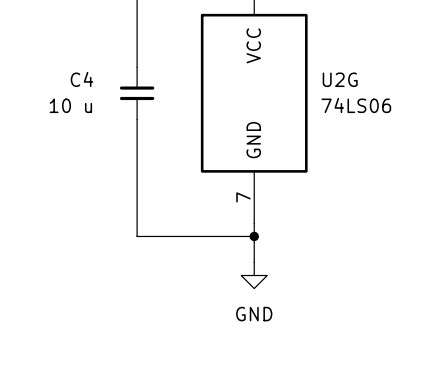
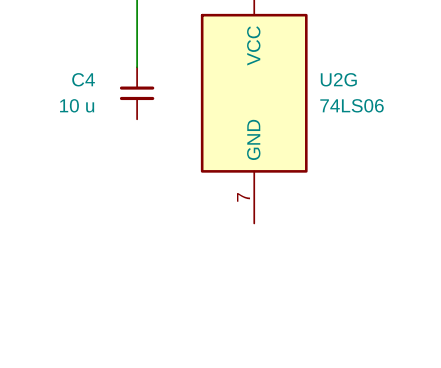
wire: (137, 119) (137, 236) (254, 236) -> none
wire: (254, 223) (254, 262) -> none
junction: (254, 236) -> none
power symbol: GND (254, 275) -> none

